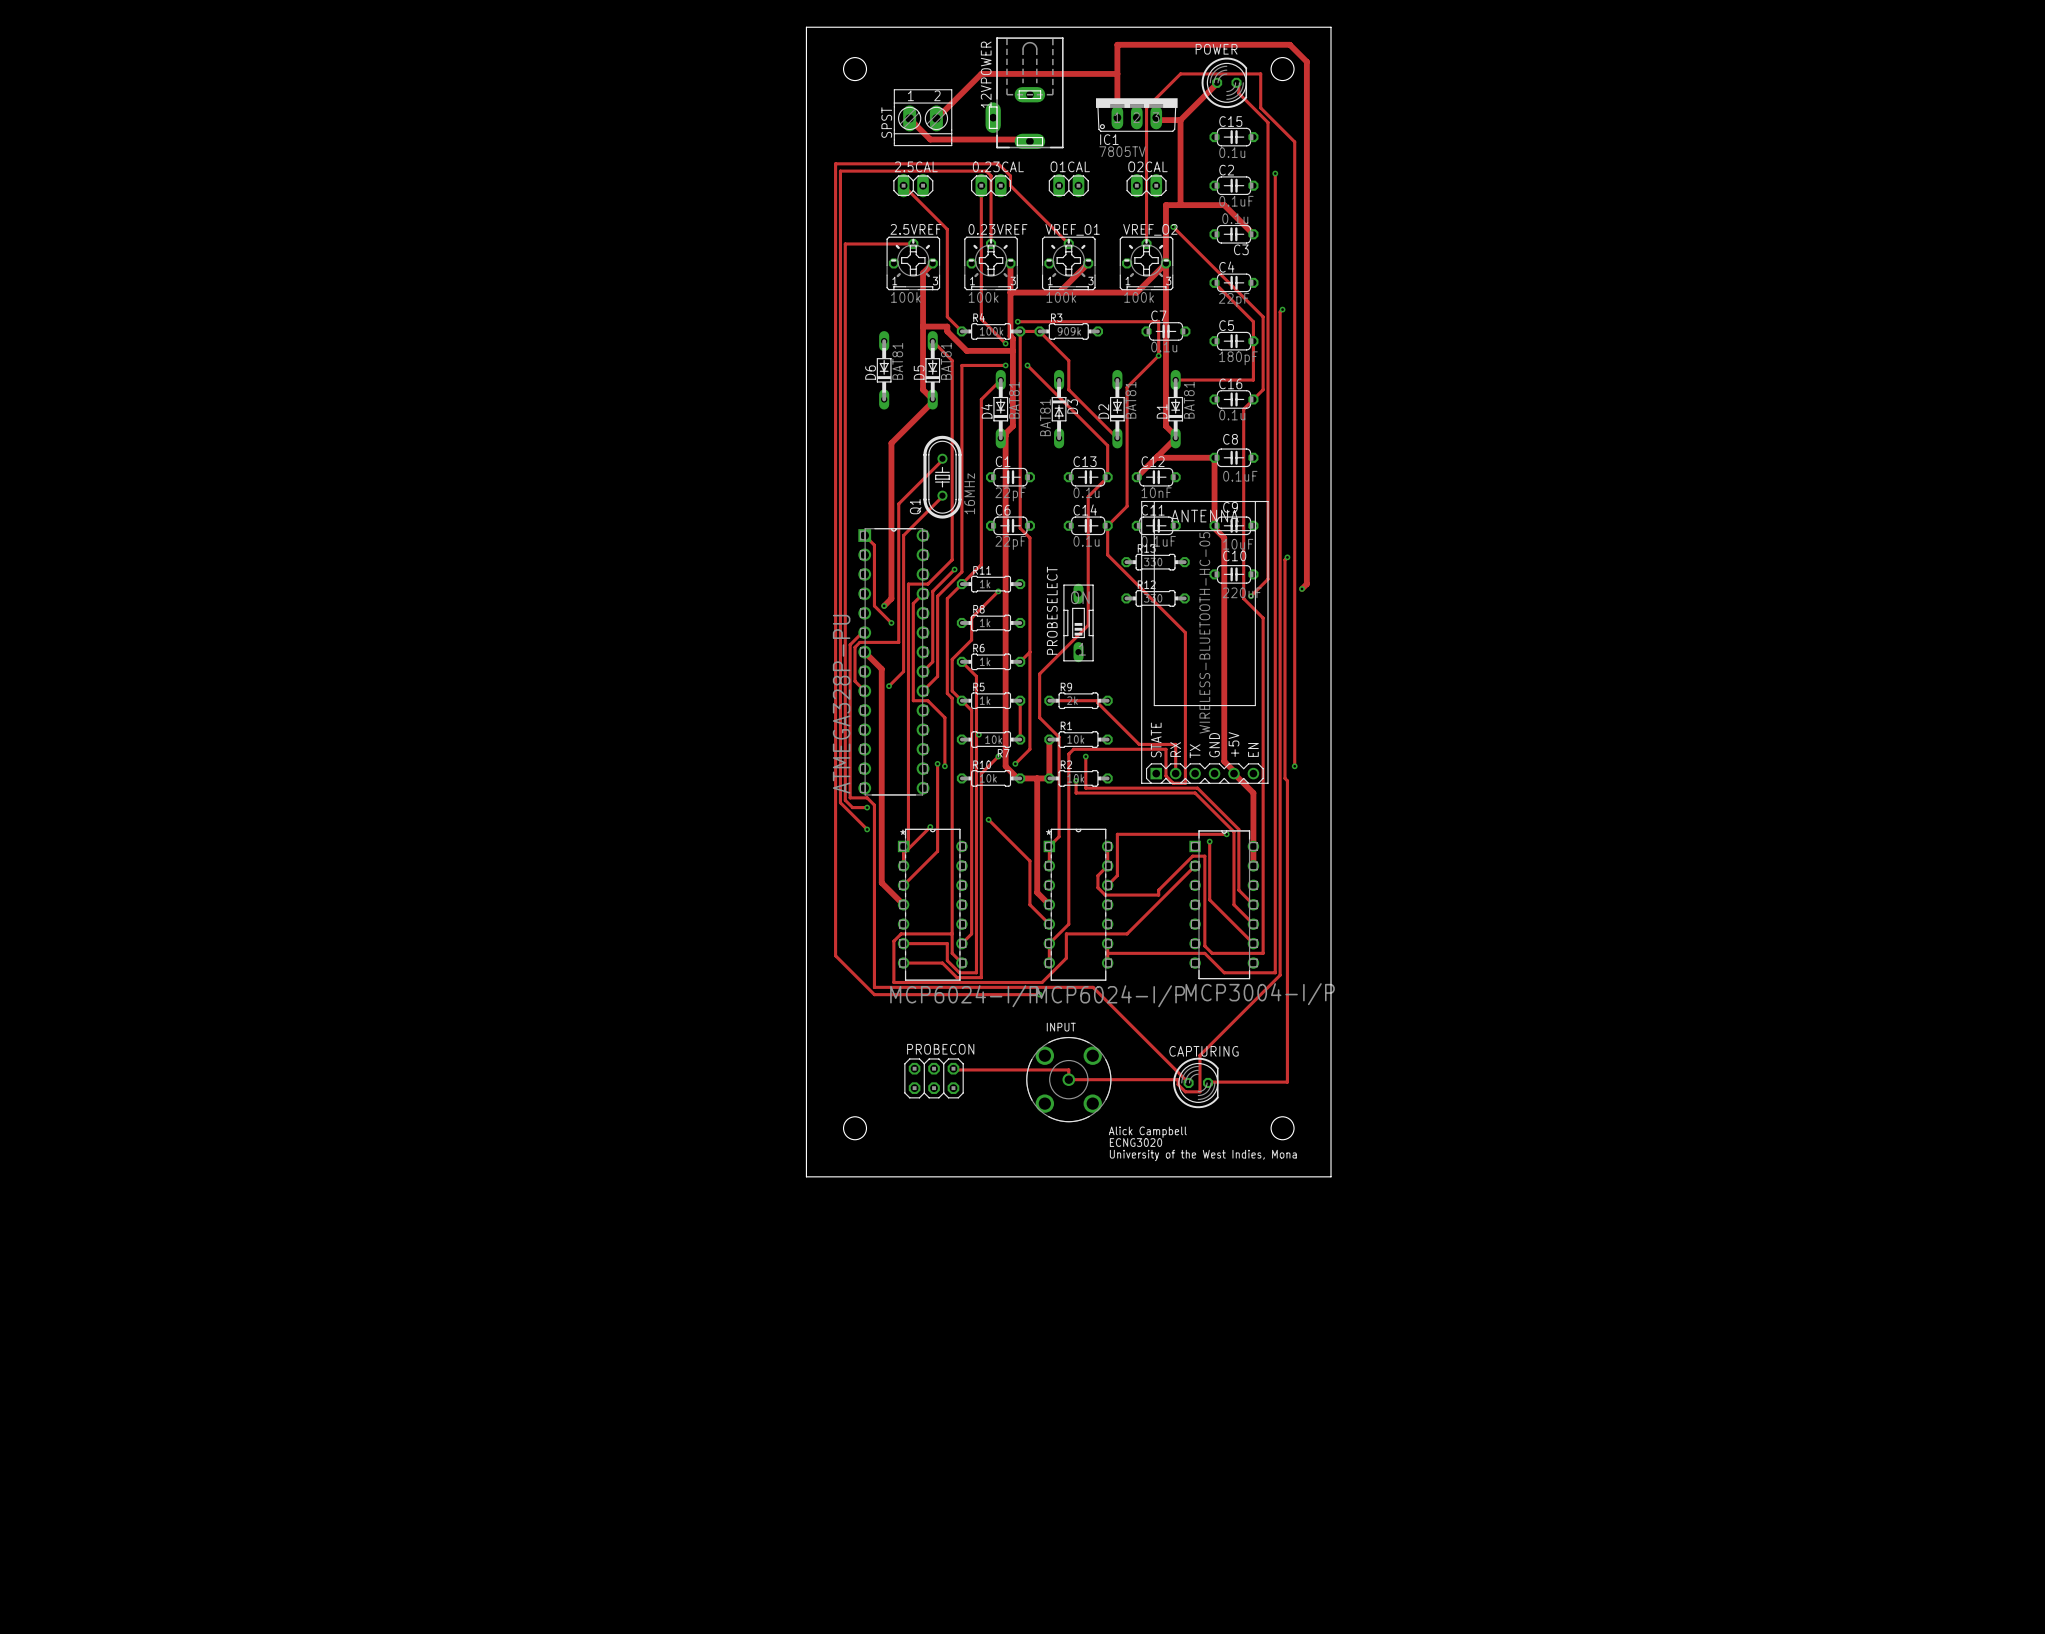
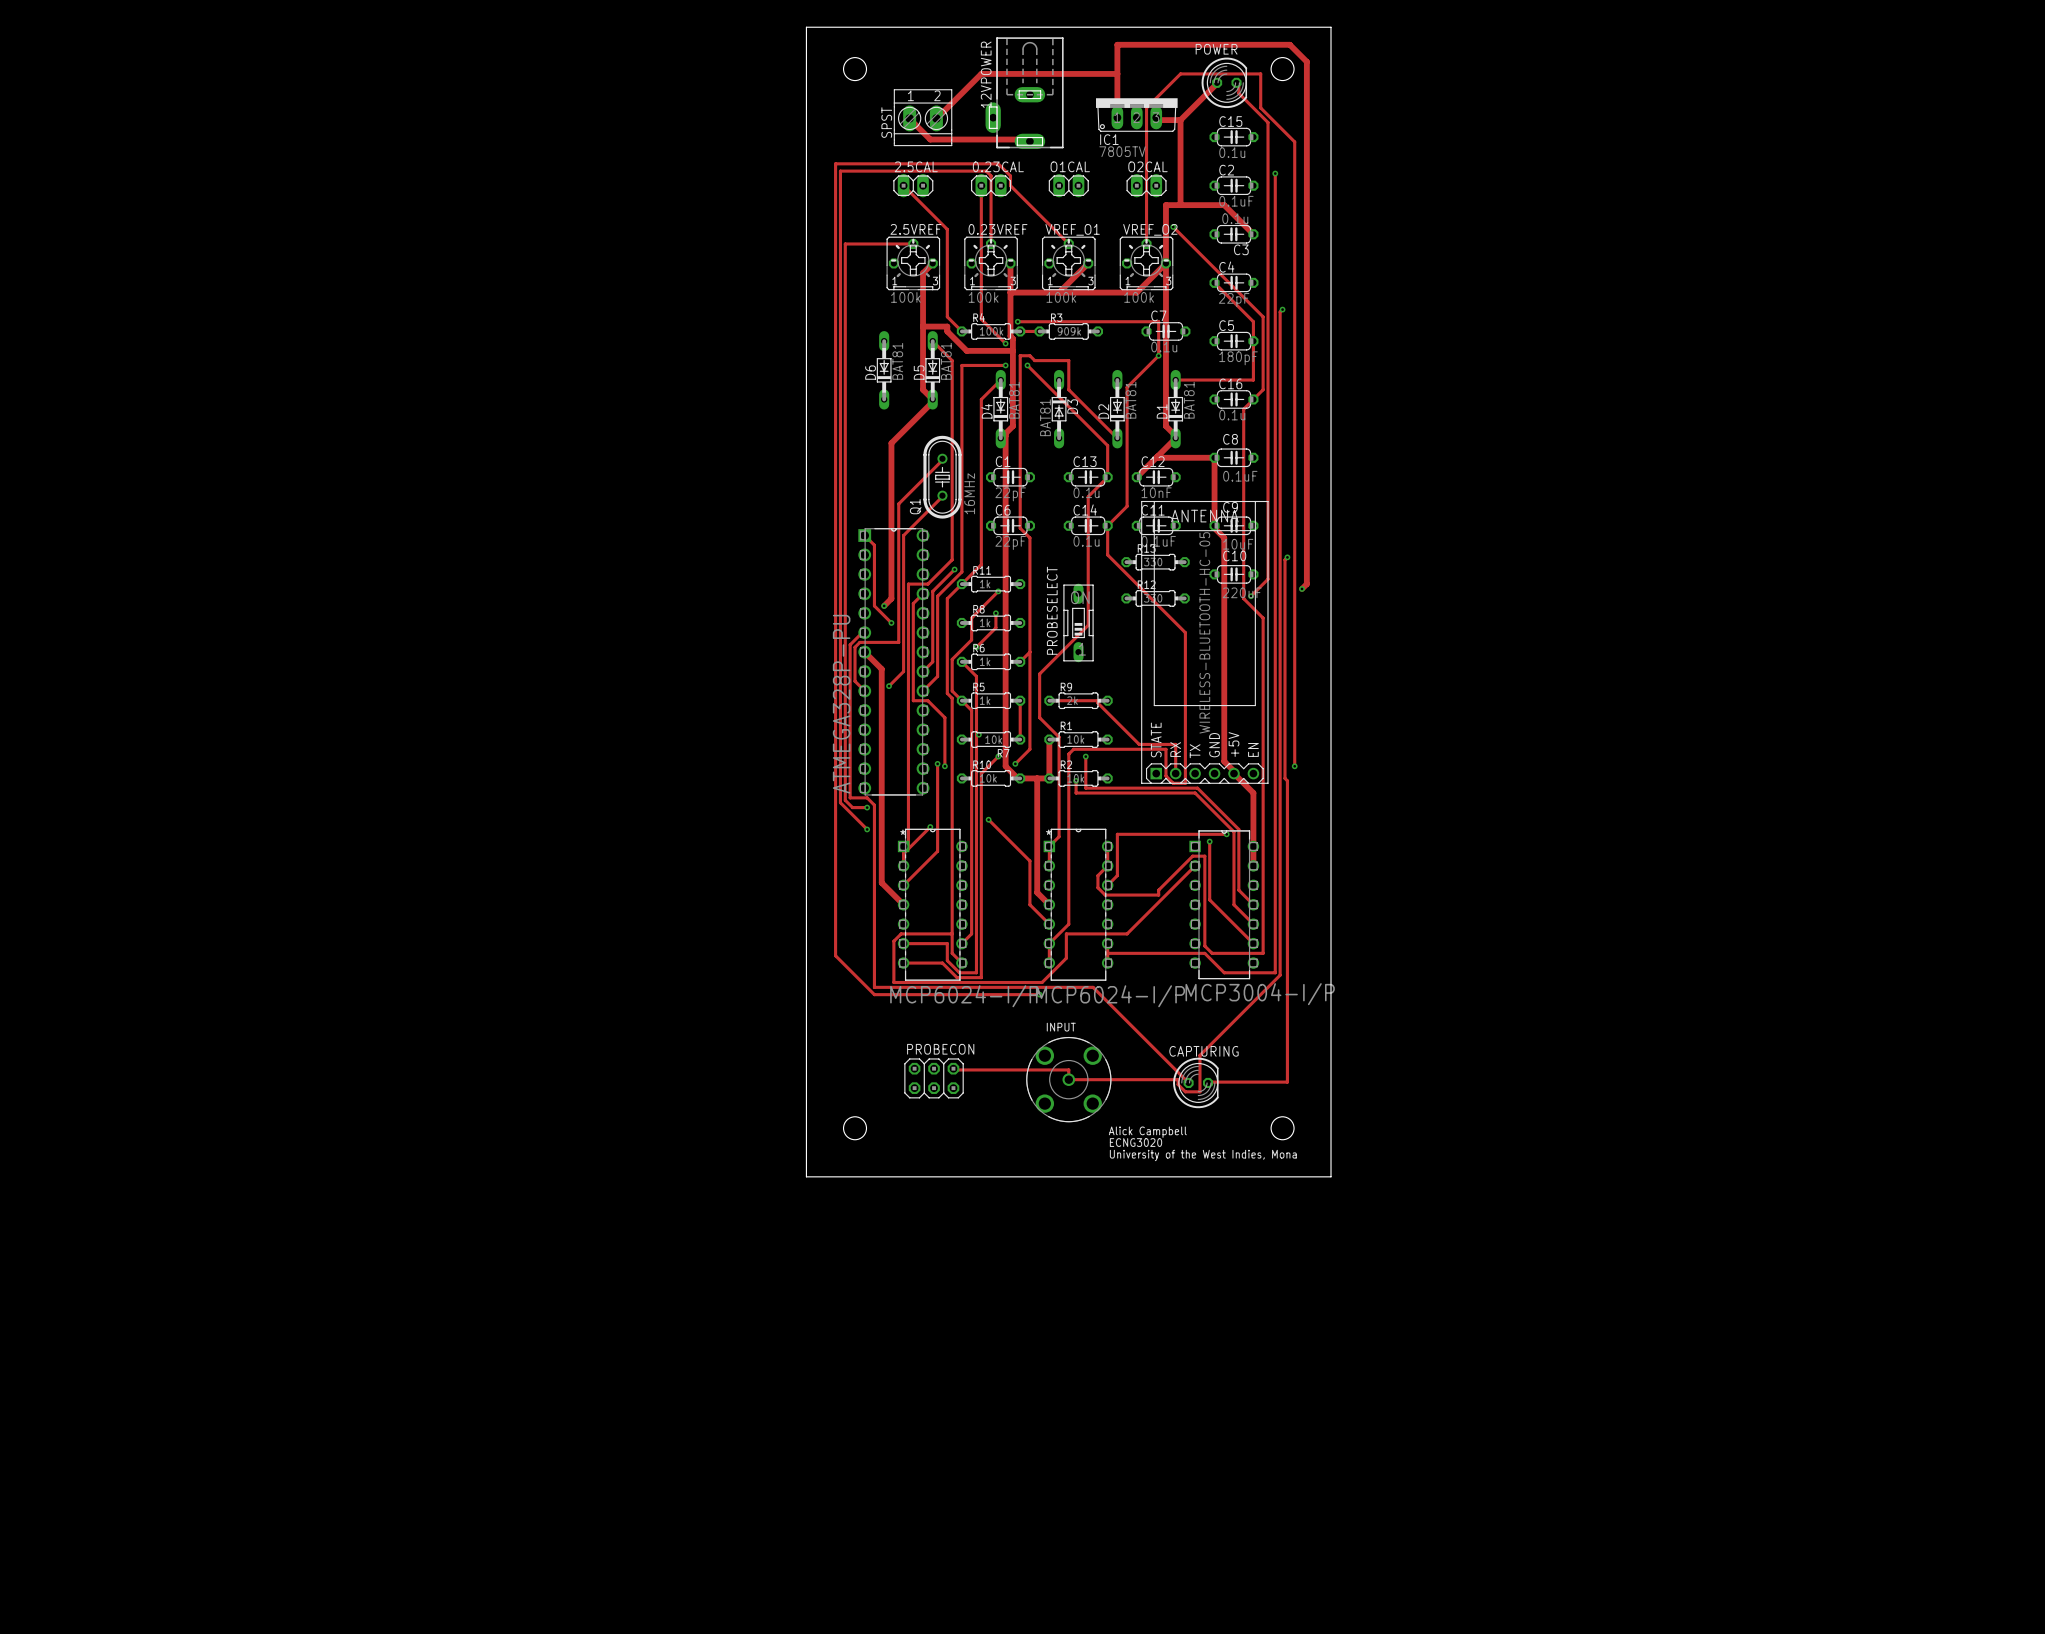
track: (1020, 331) (1020, 355) -> none
track: (1039, 331) (1068, 360) -> (1020, 355) (1029, 355) (1034, 360) (1068, 360)
track: none -> (995, 613) (995, 627) (976, 647)
via: none -> (995, 613)
via: none -> (976, 647)

